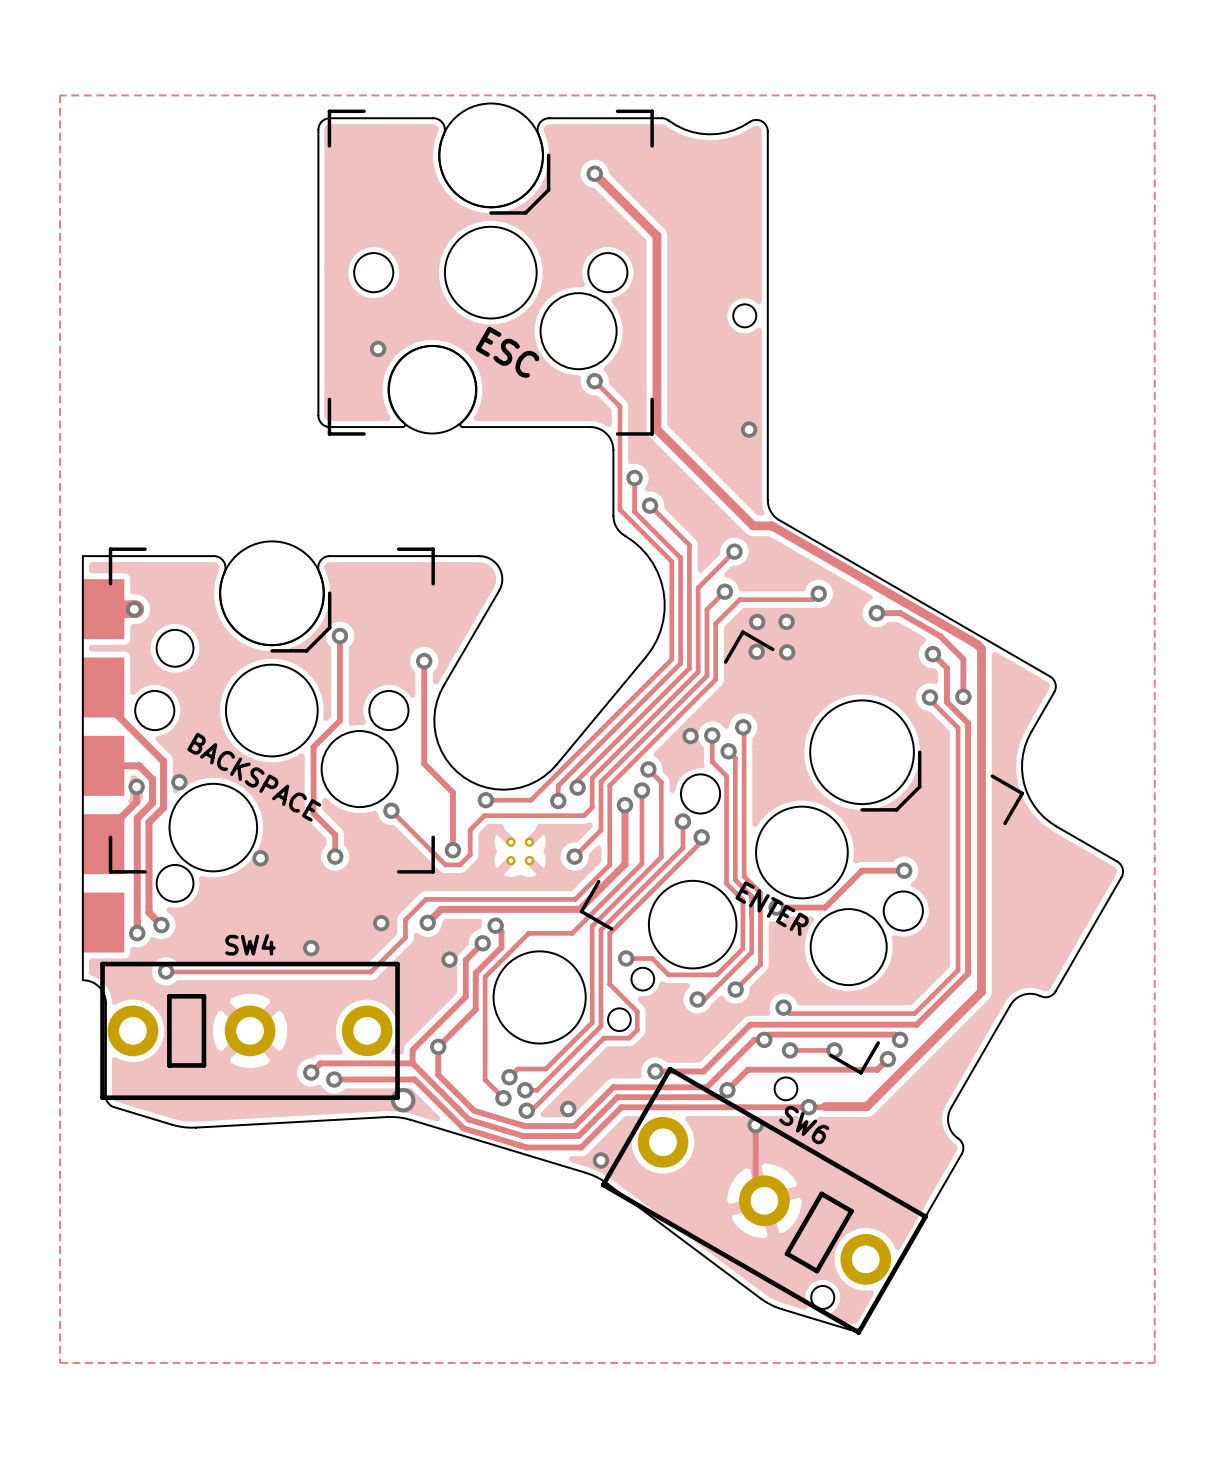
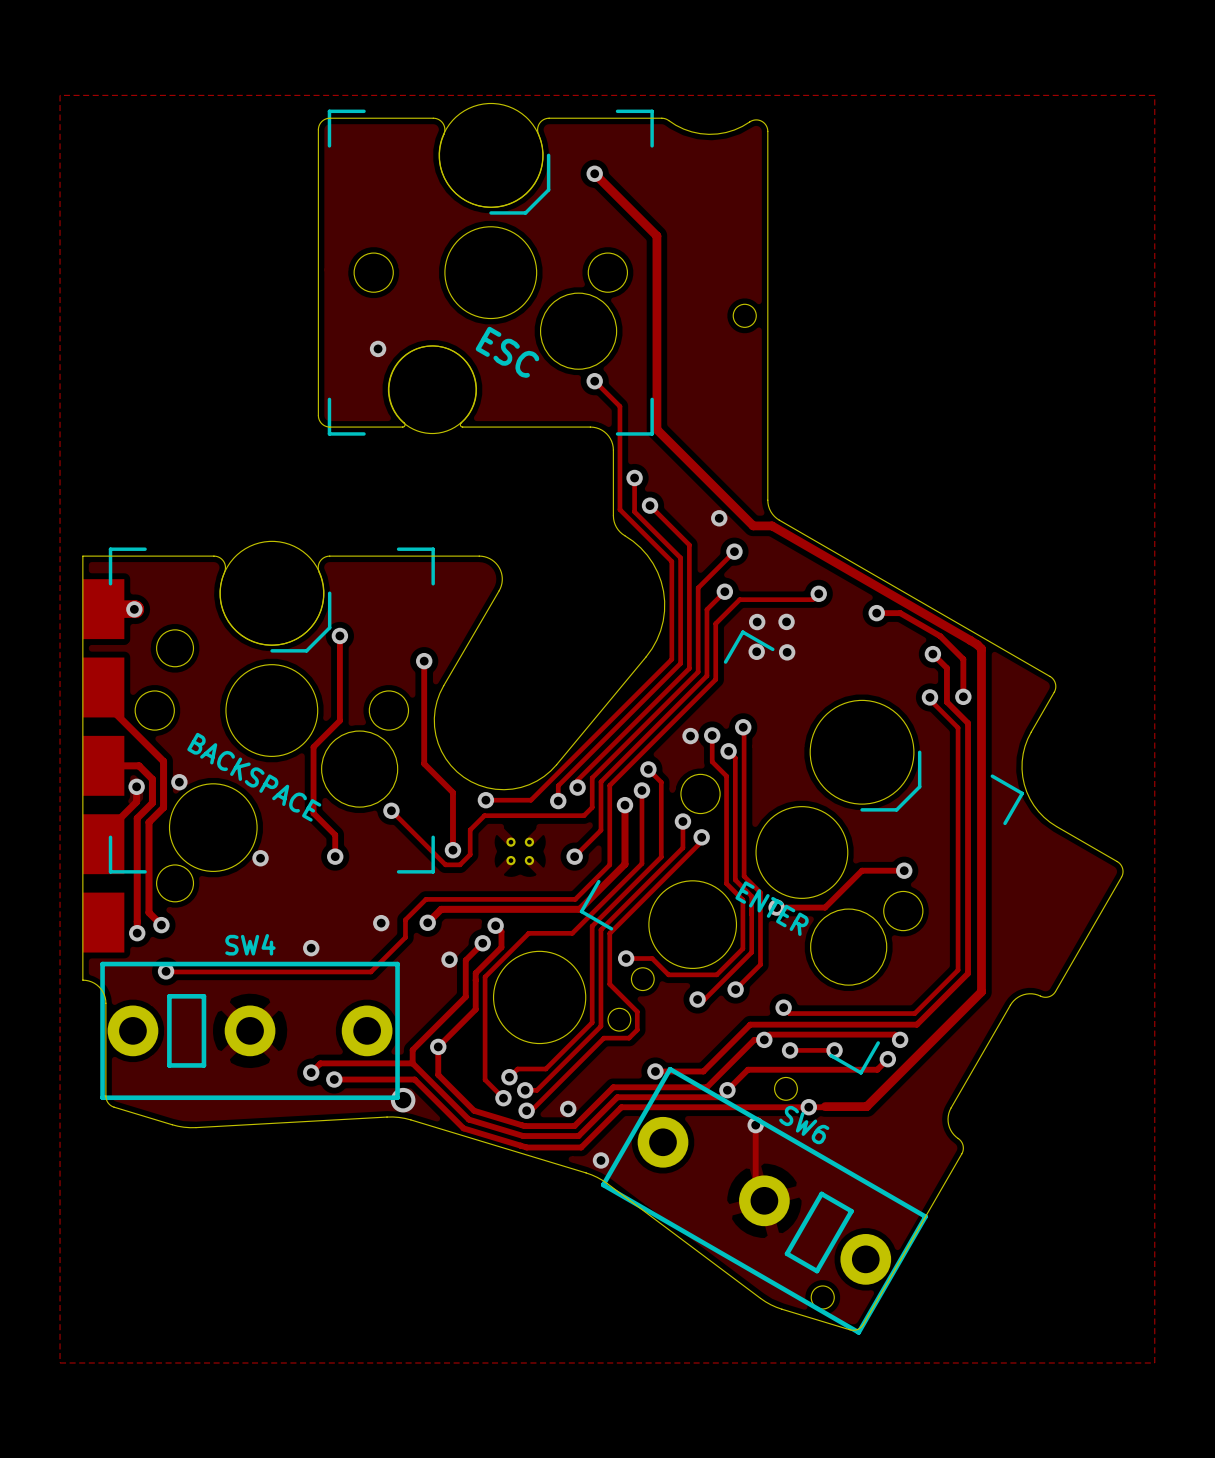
via position: (749, 429) -> (719, 518)

